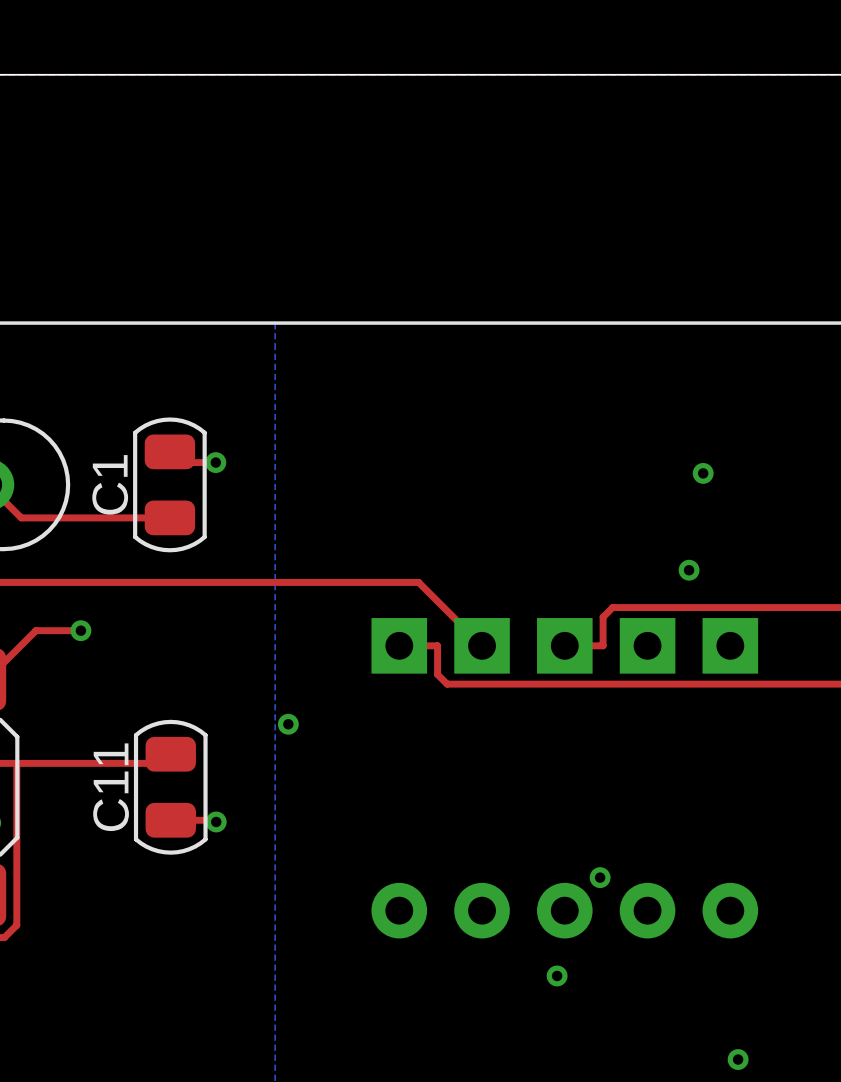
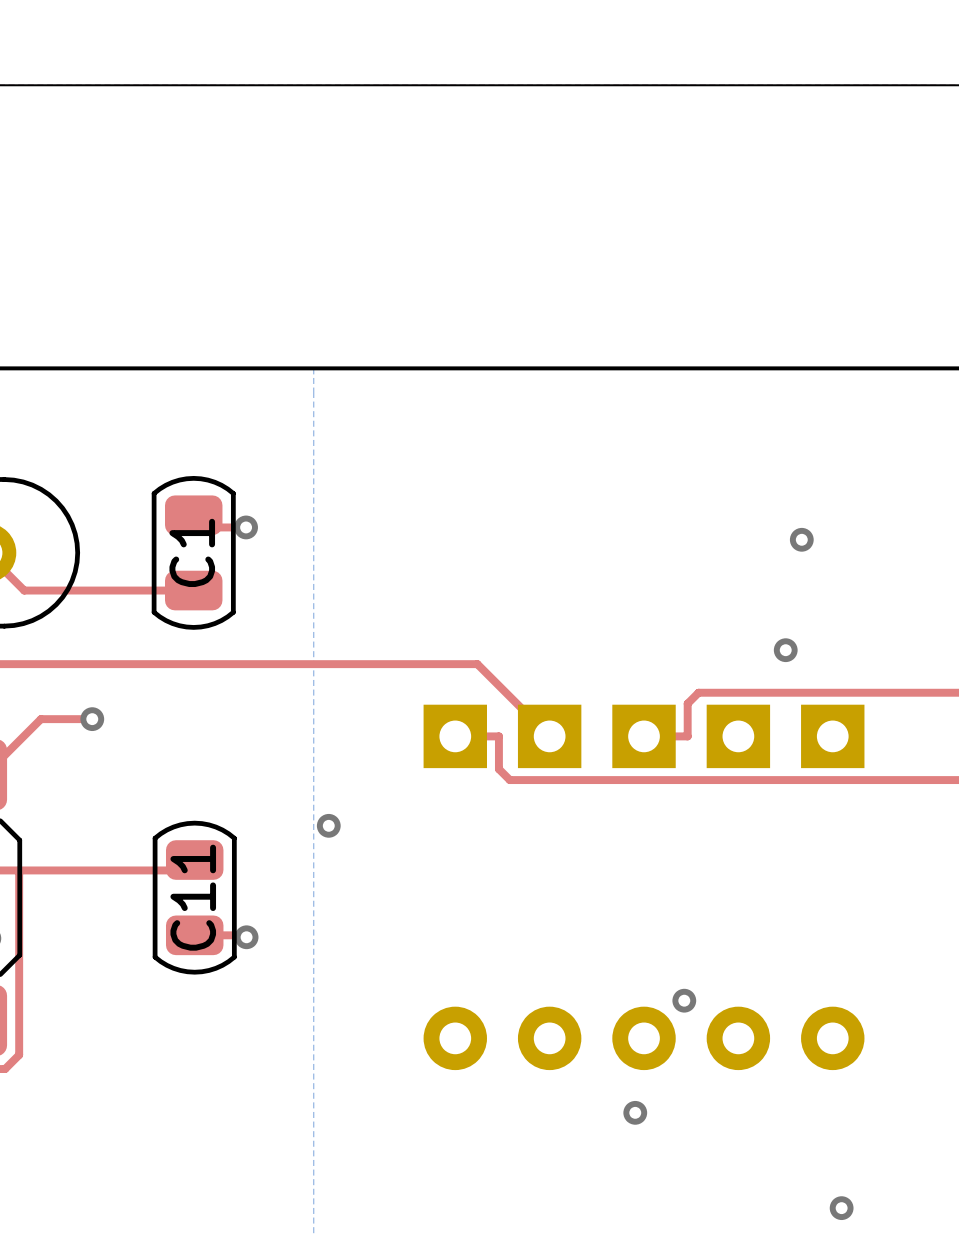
C1 name position: C1 (110, 484) -> C1 (192, 552)
C11 name position: C11 (111, 787) -> C11 (193, 897)

